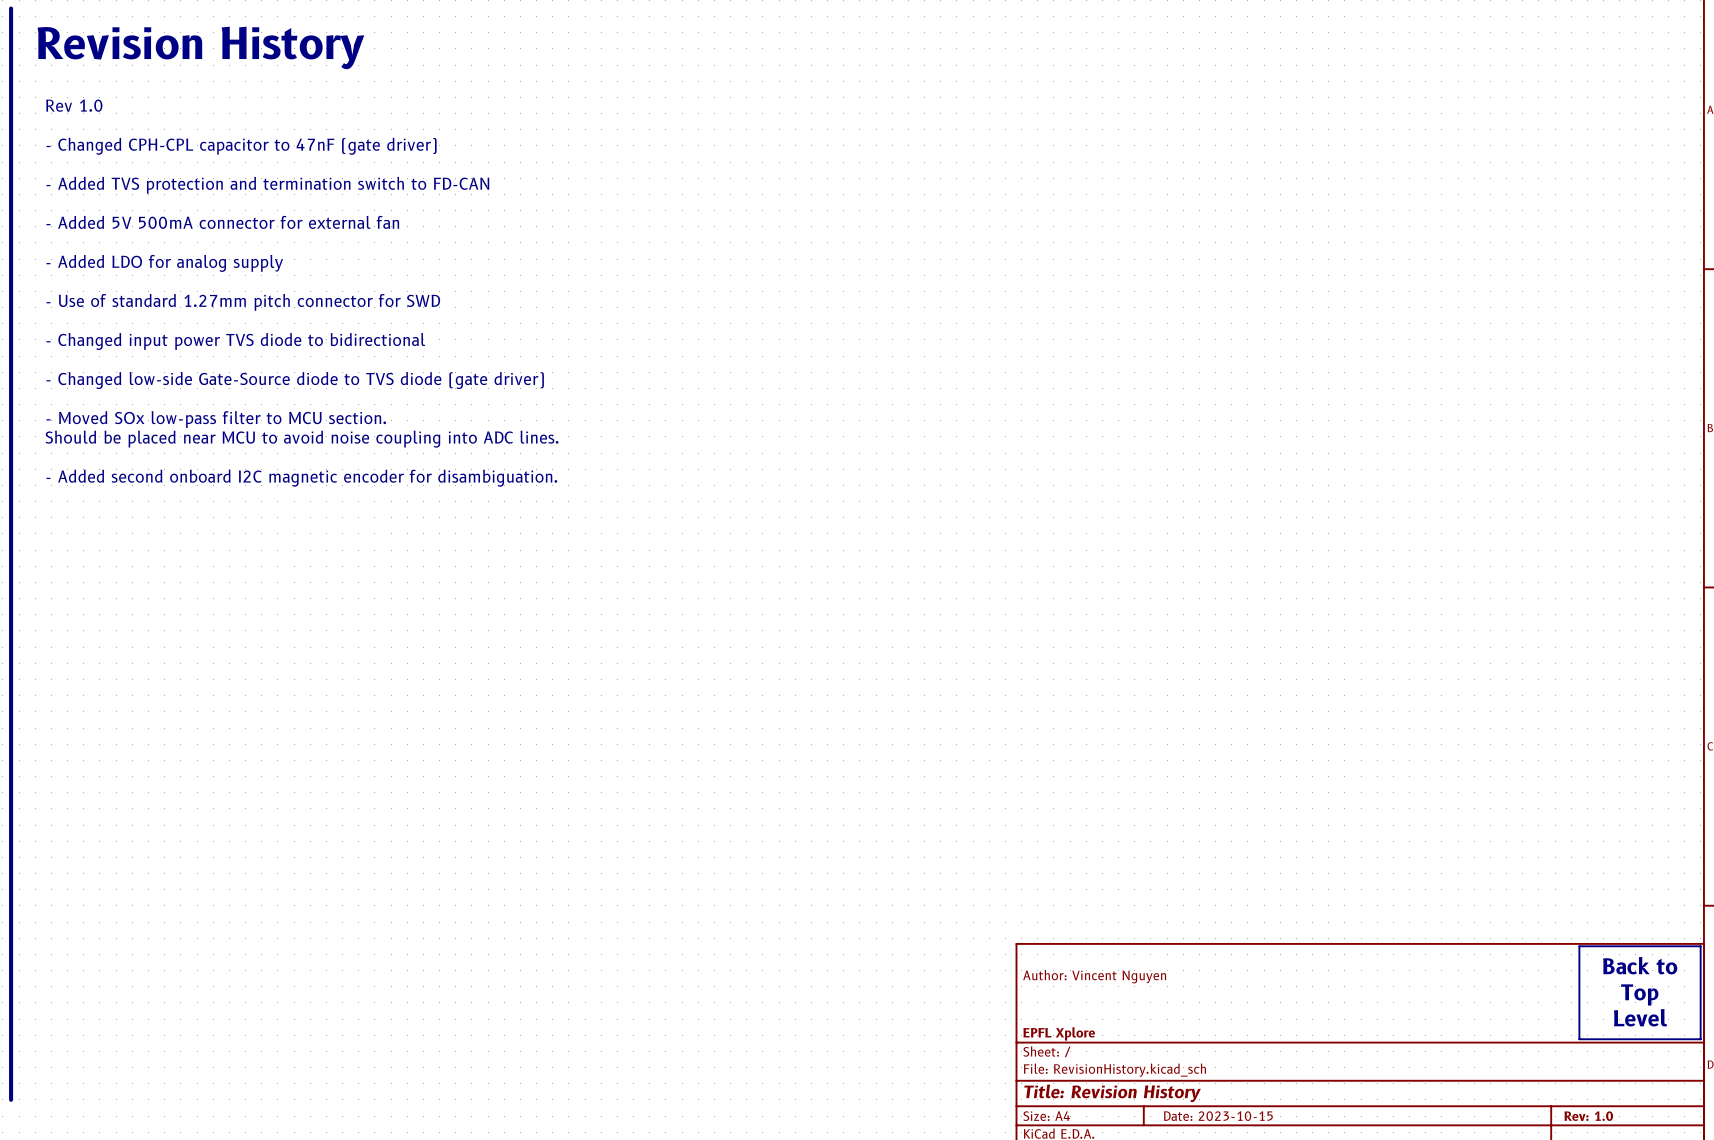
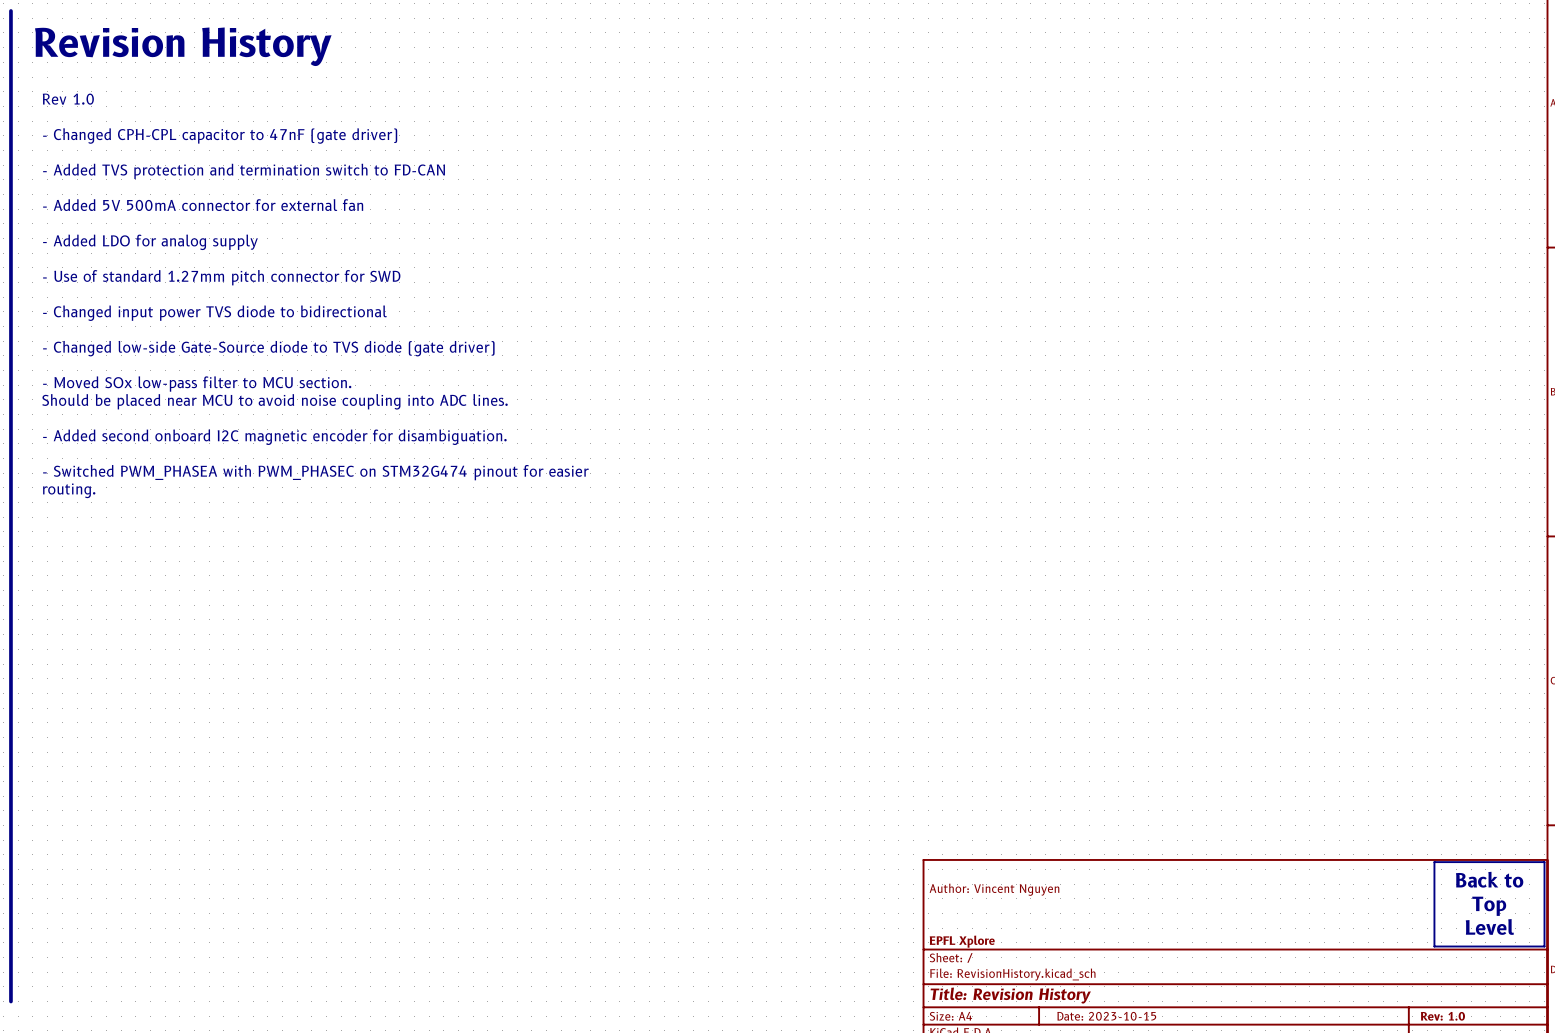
text: none -> - Switched PWM_PHASEA with PWM_PHASEC on STM32G474 pinout for easier (315, 472)
text: none -> routing. (69, 490)

